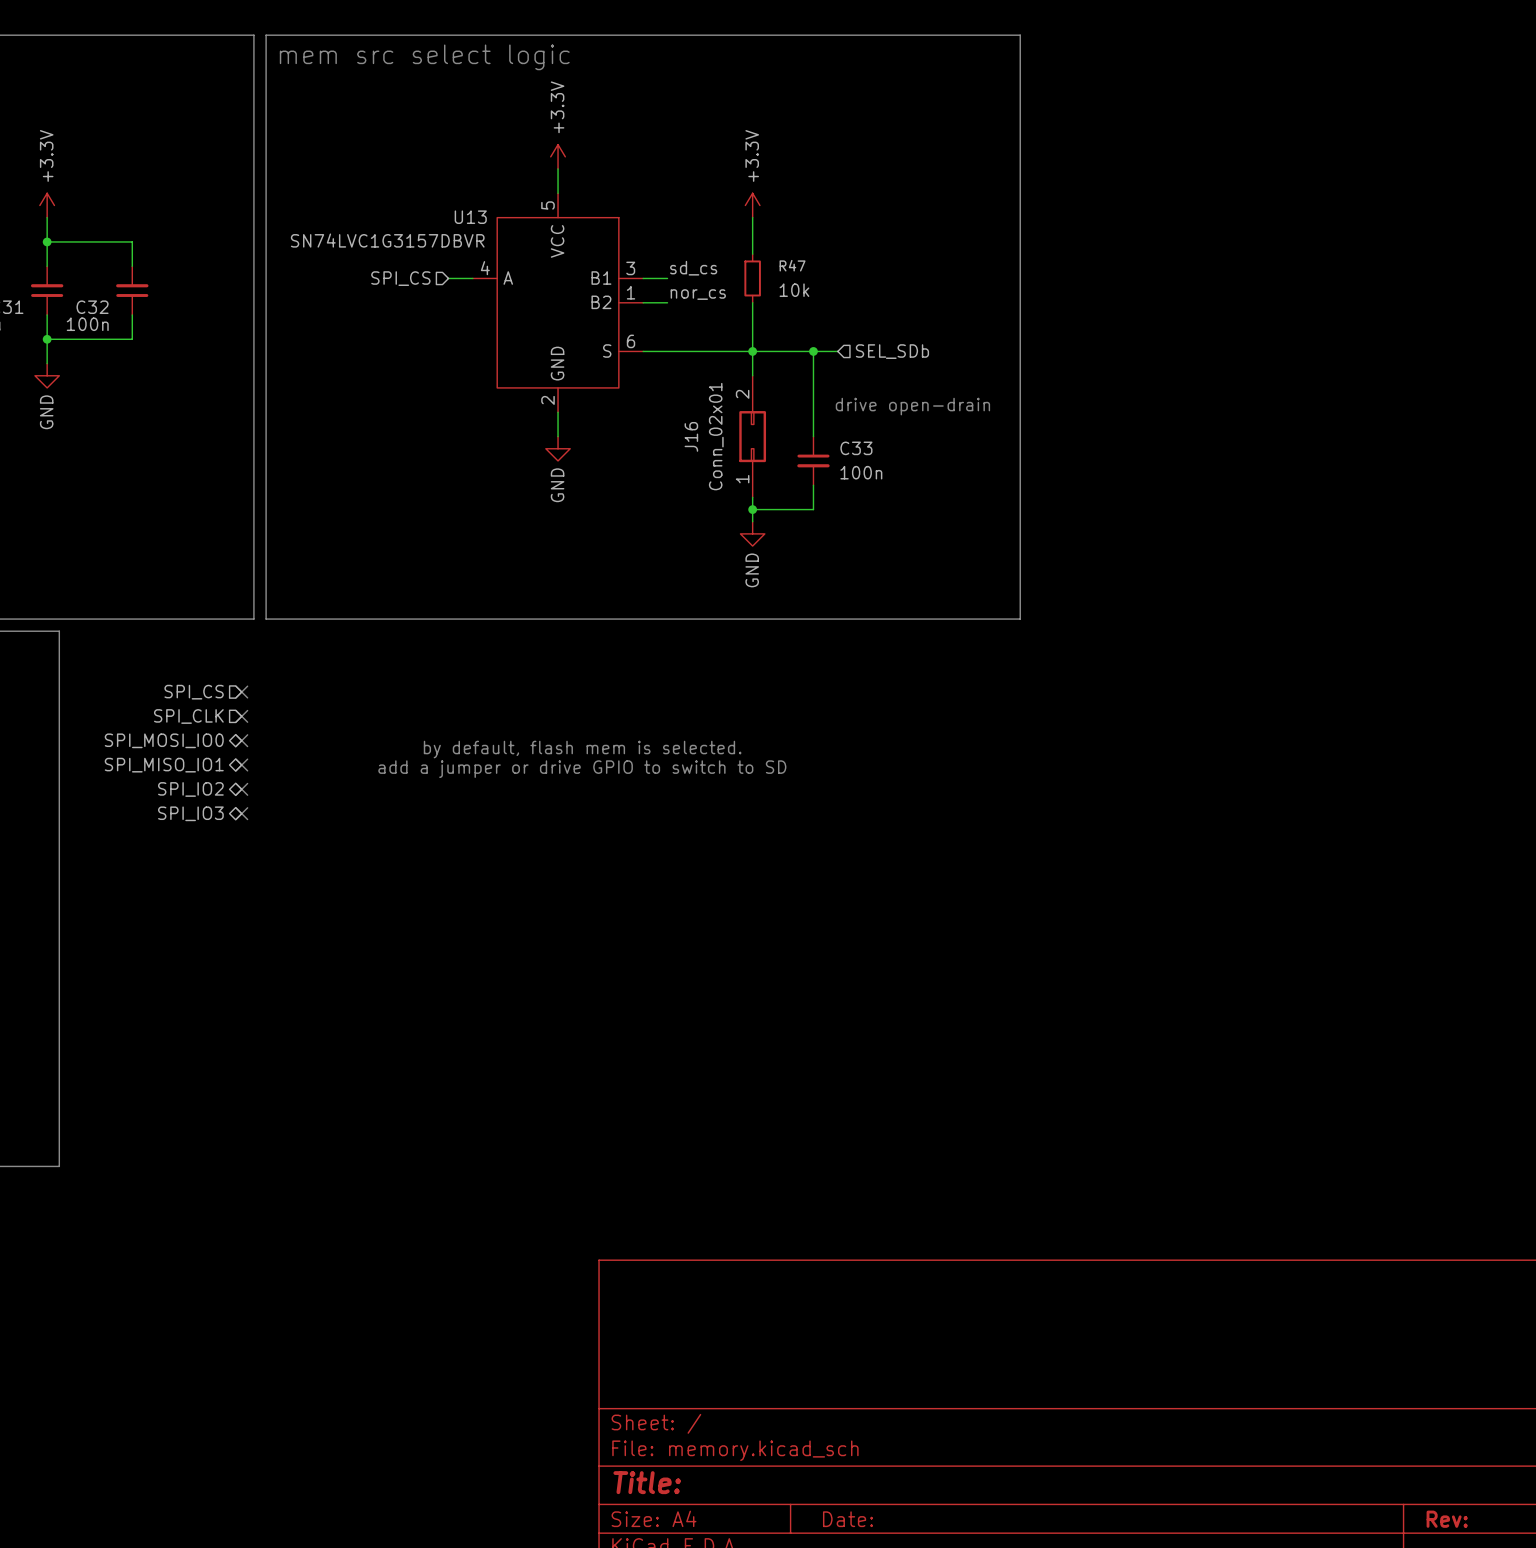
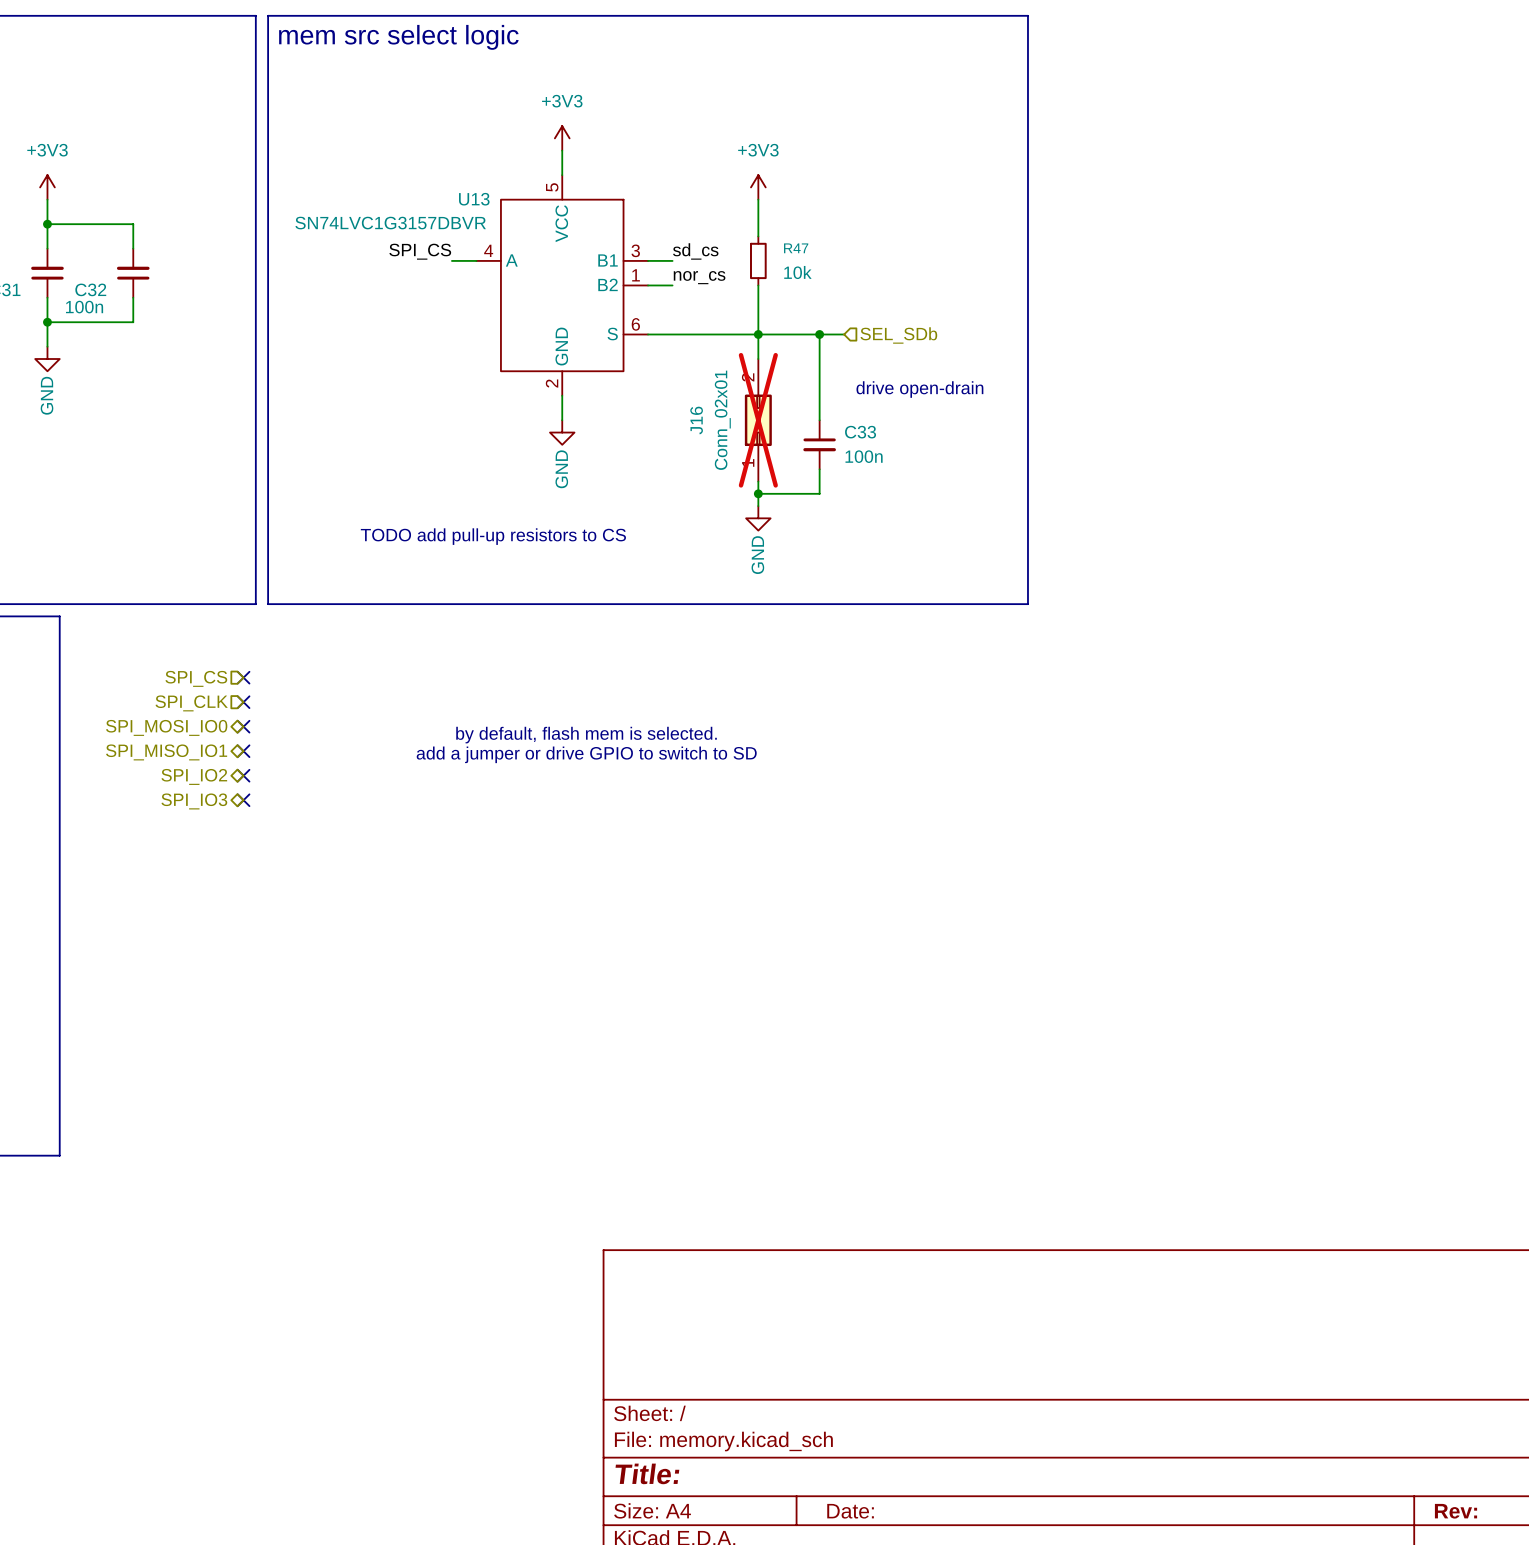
power symbol: +3.3V (558, 156) -> +3V3 (562, 138)
power symbol: +3.3V (47, 205) -> +3V3 (47, 187)
power symbol: +3.3V (752, 205) -> +3V3 (758, 187)
label: none -> SPI_CS (420, 251)
hierarchical label: SPI_CS (400, 278) -> none
J16 do-not-place cross: none -> (758, 420)
text: none -> TODO add pull-up resistors to CS (493, 536)

